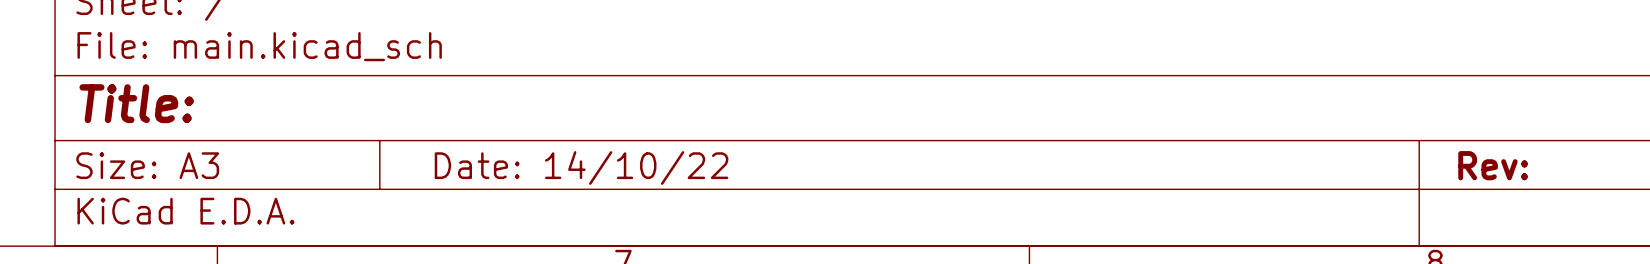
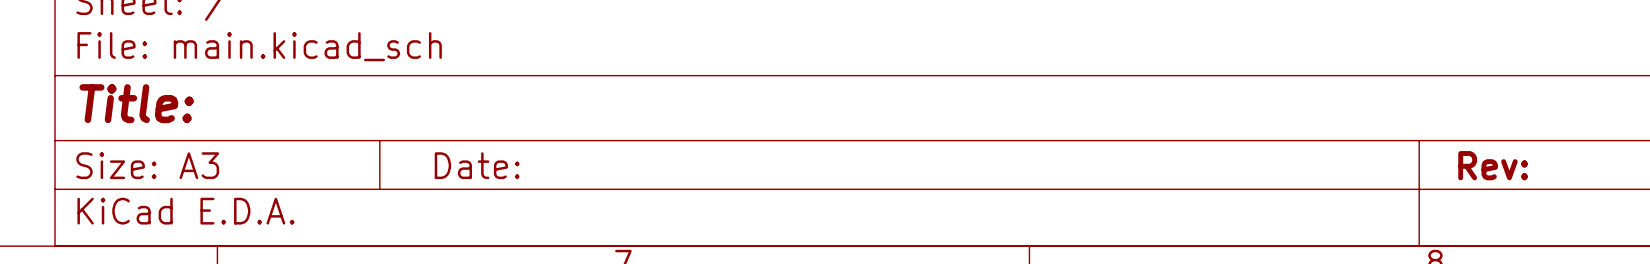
title block: Date: 14/10/22 (581, 167) -> Date: (477, 165)

